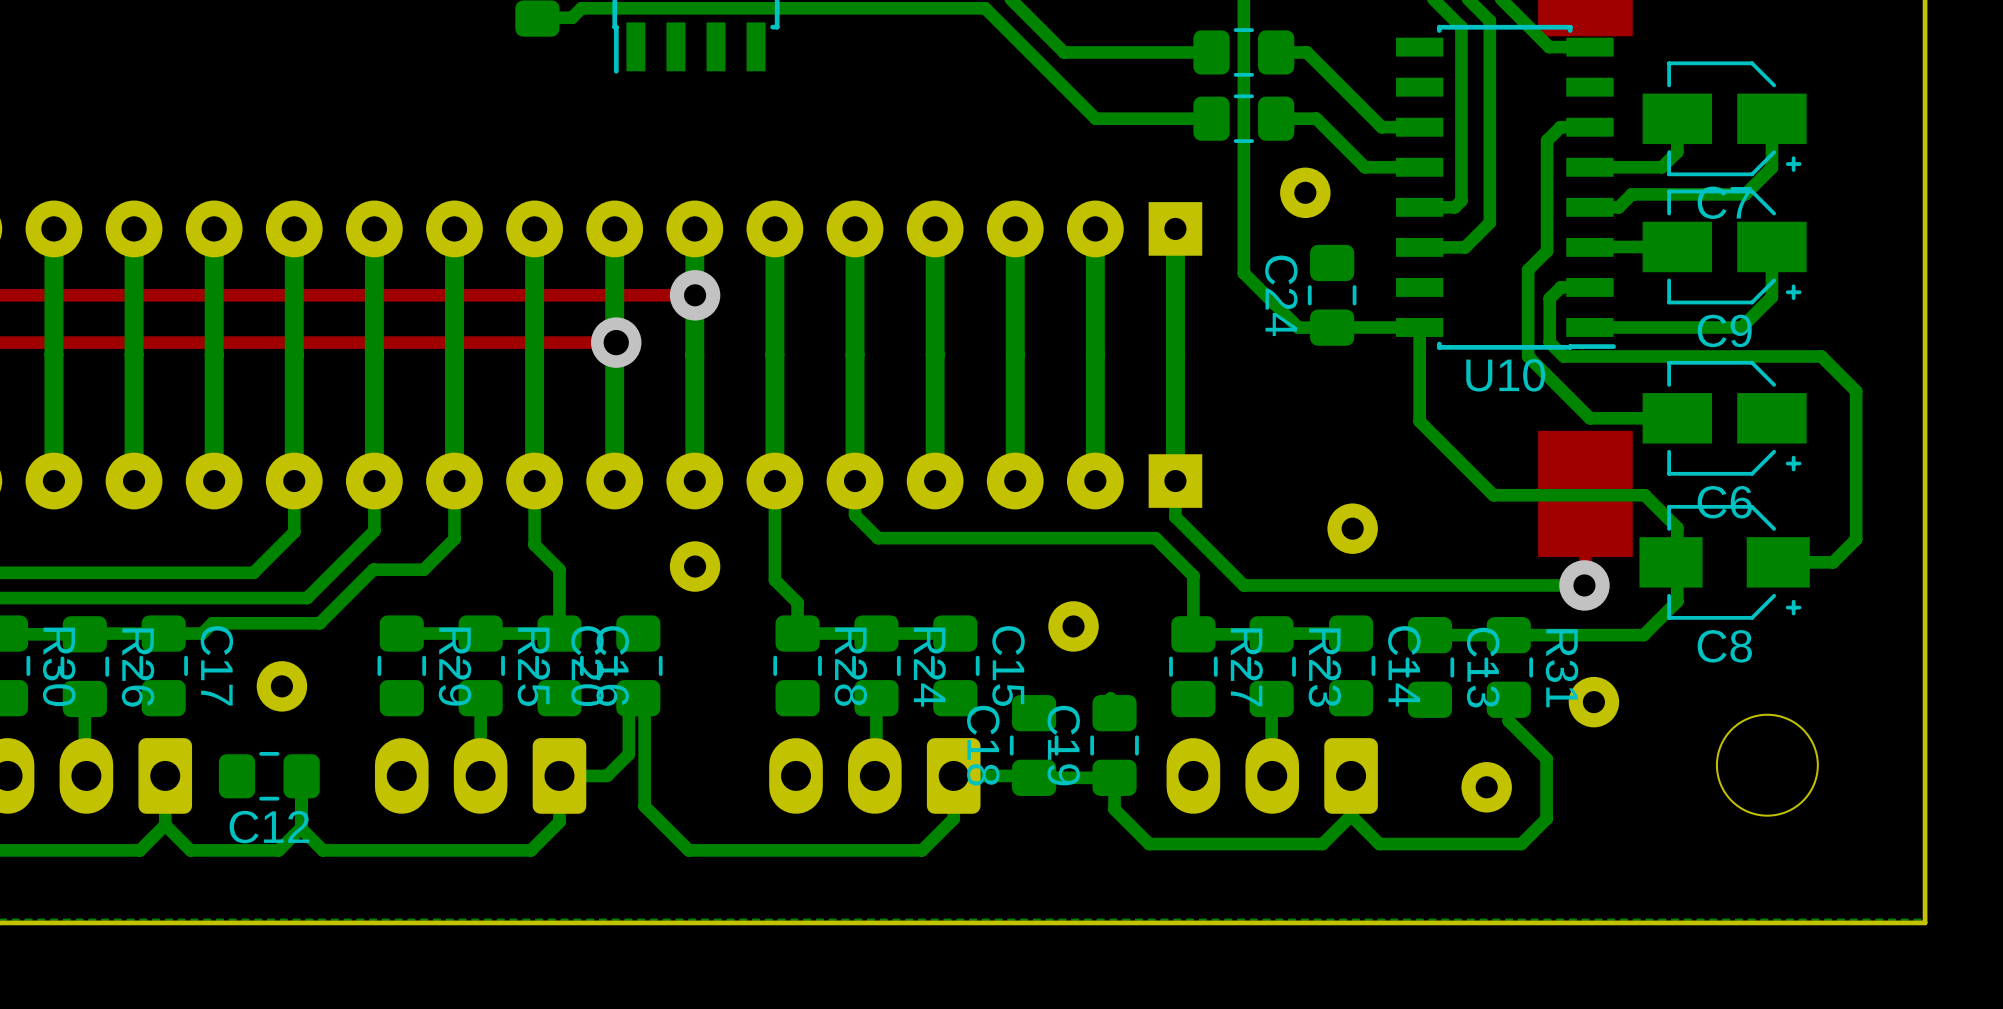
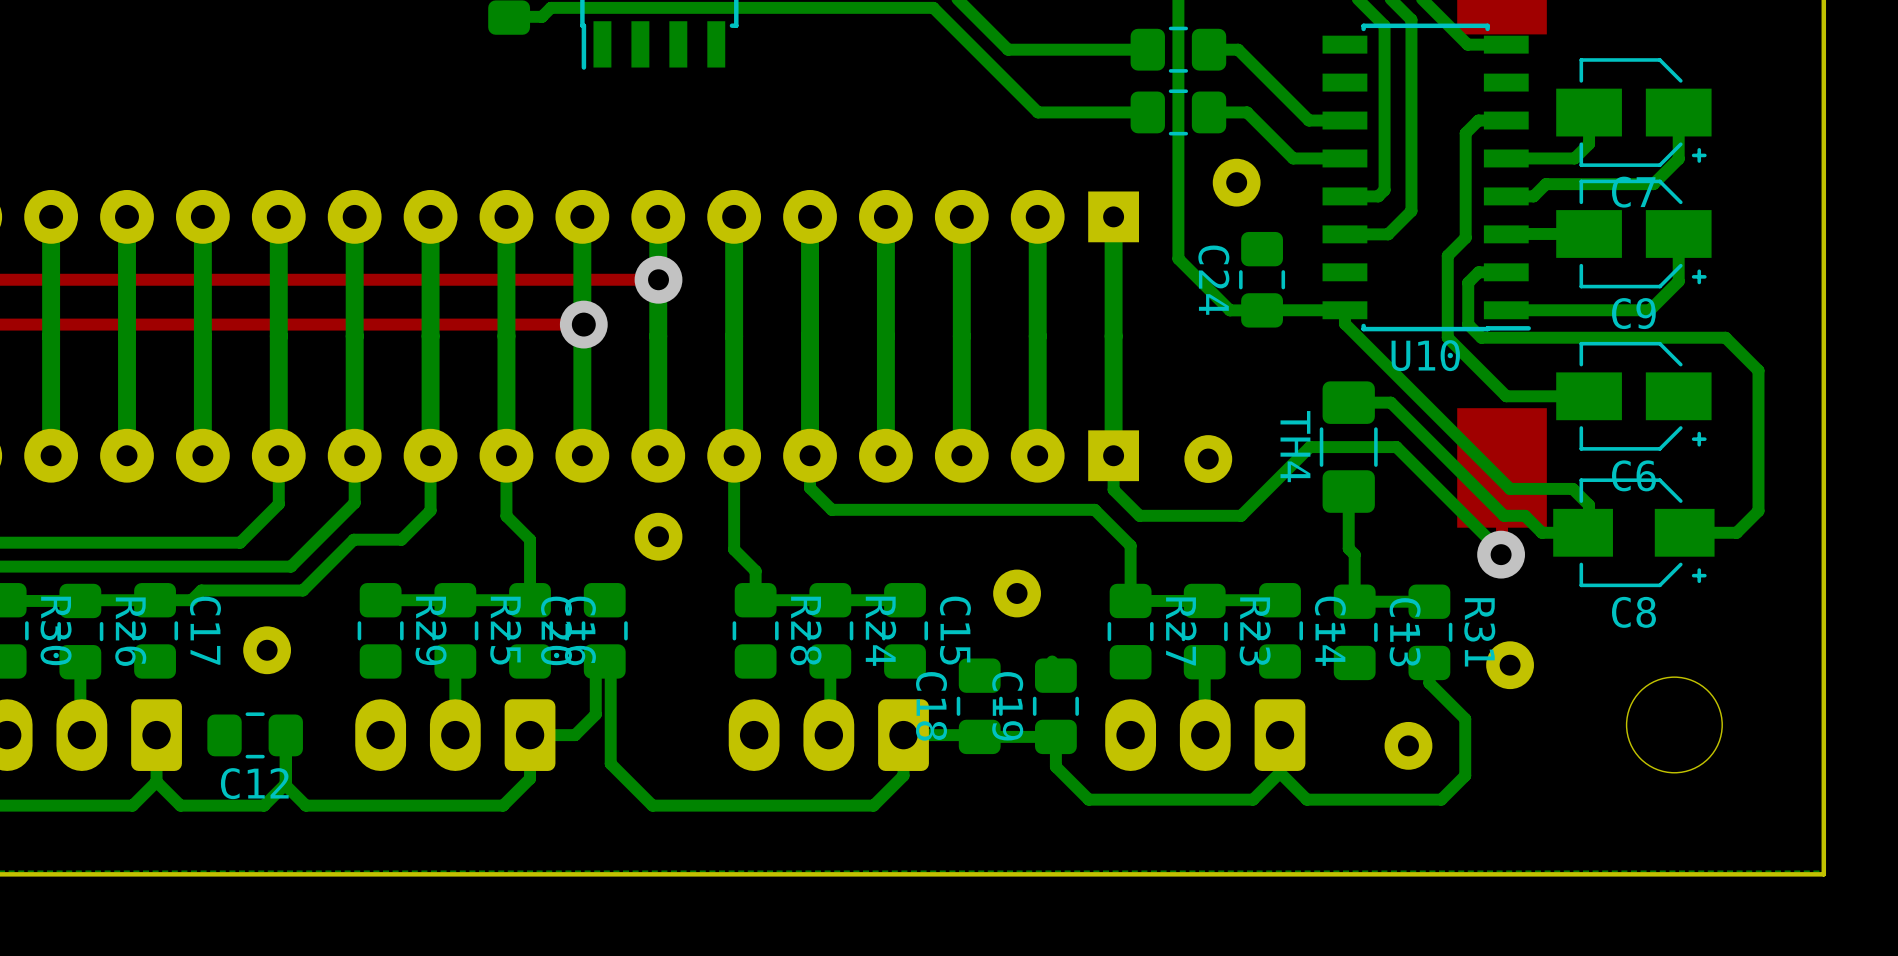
bottom track: (1419, 341) (1419, 421) (1493, 495) (1644, 495) (1677, 527) (1677, 533) -> (1344, 323) (1510, 488) (1572, 488) (1589, 505)
TH4: none -> (1348, 447)
bottom track: none -> (1348, 491) (1348, 548) (1354, 554) (1354, 601)
part position: (1352, 528) -> (1208, 459)
bottom track: (1202, 544) (1243, 585) (1584, 585) -> (1139, 515) (1241, 515) (1309, 447) (1396, 447) (1501, 551) (1501, 554)
bottom track: (1677, 562) (1677, 601) (1643, 635) (1508, 635) -> (1589, 532) (1541, 532) (1525, 515) (1504, 515) (1390, 402) (1348, 402)

